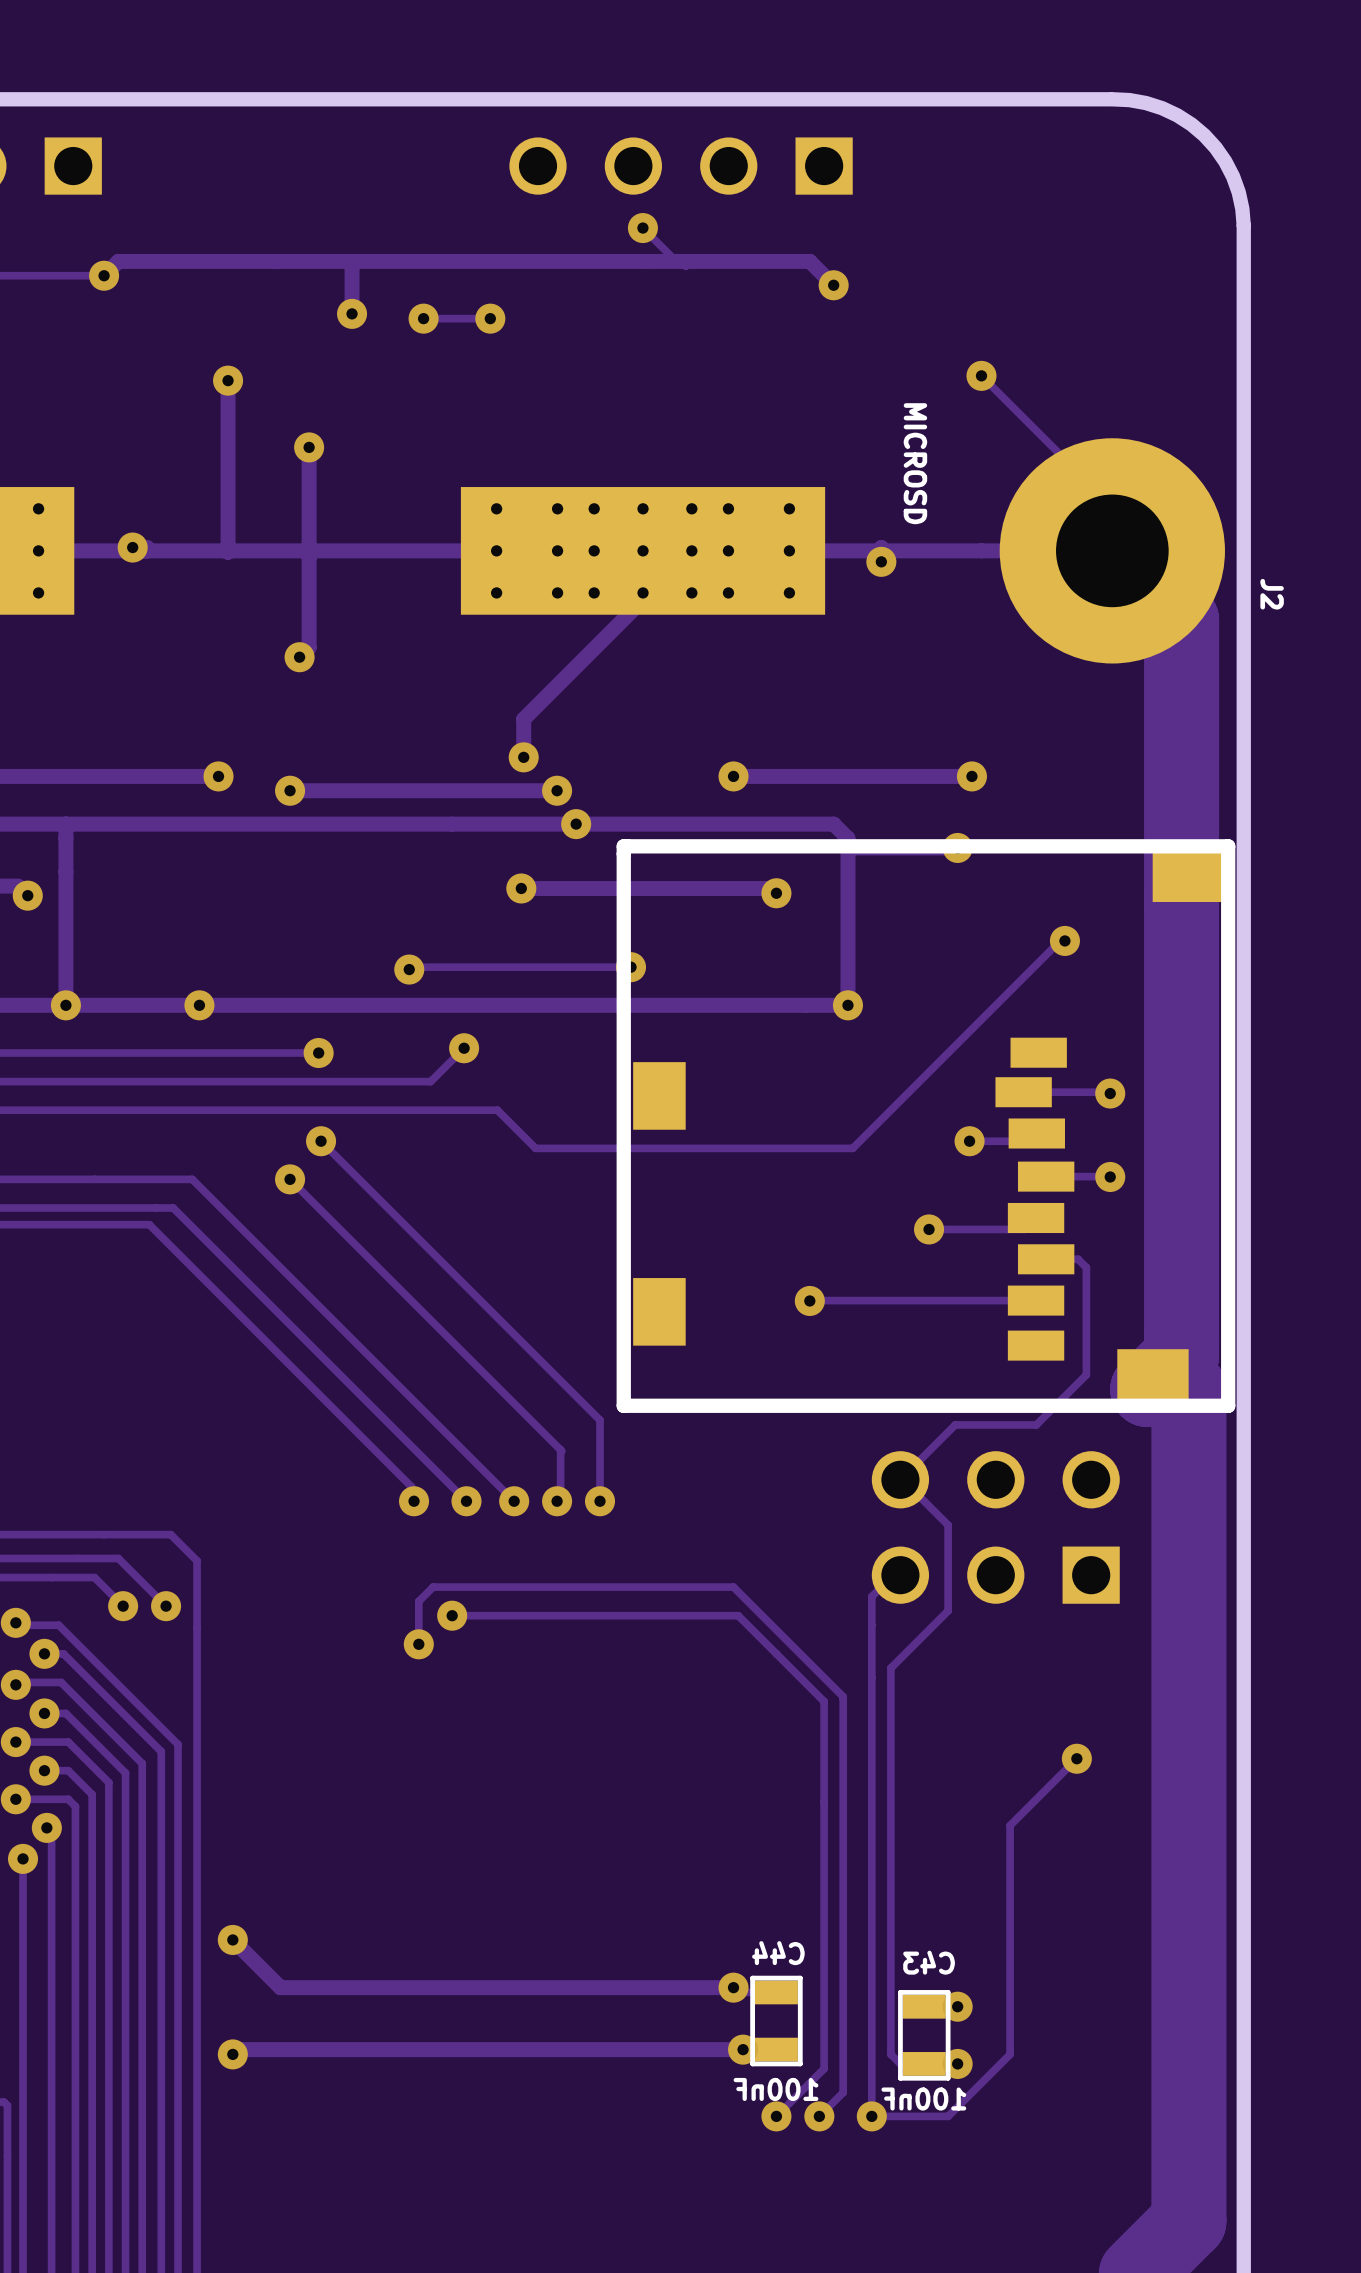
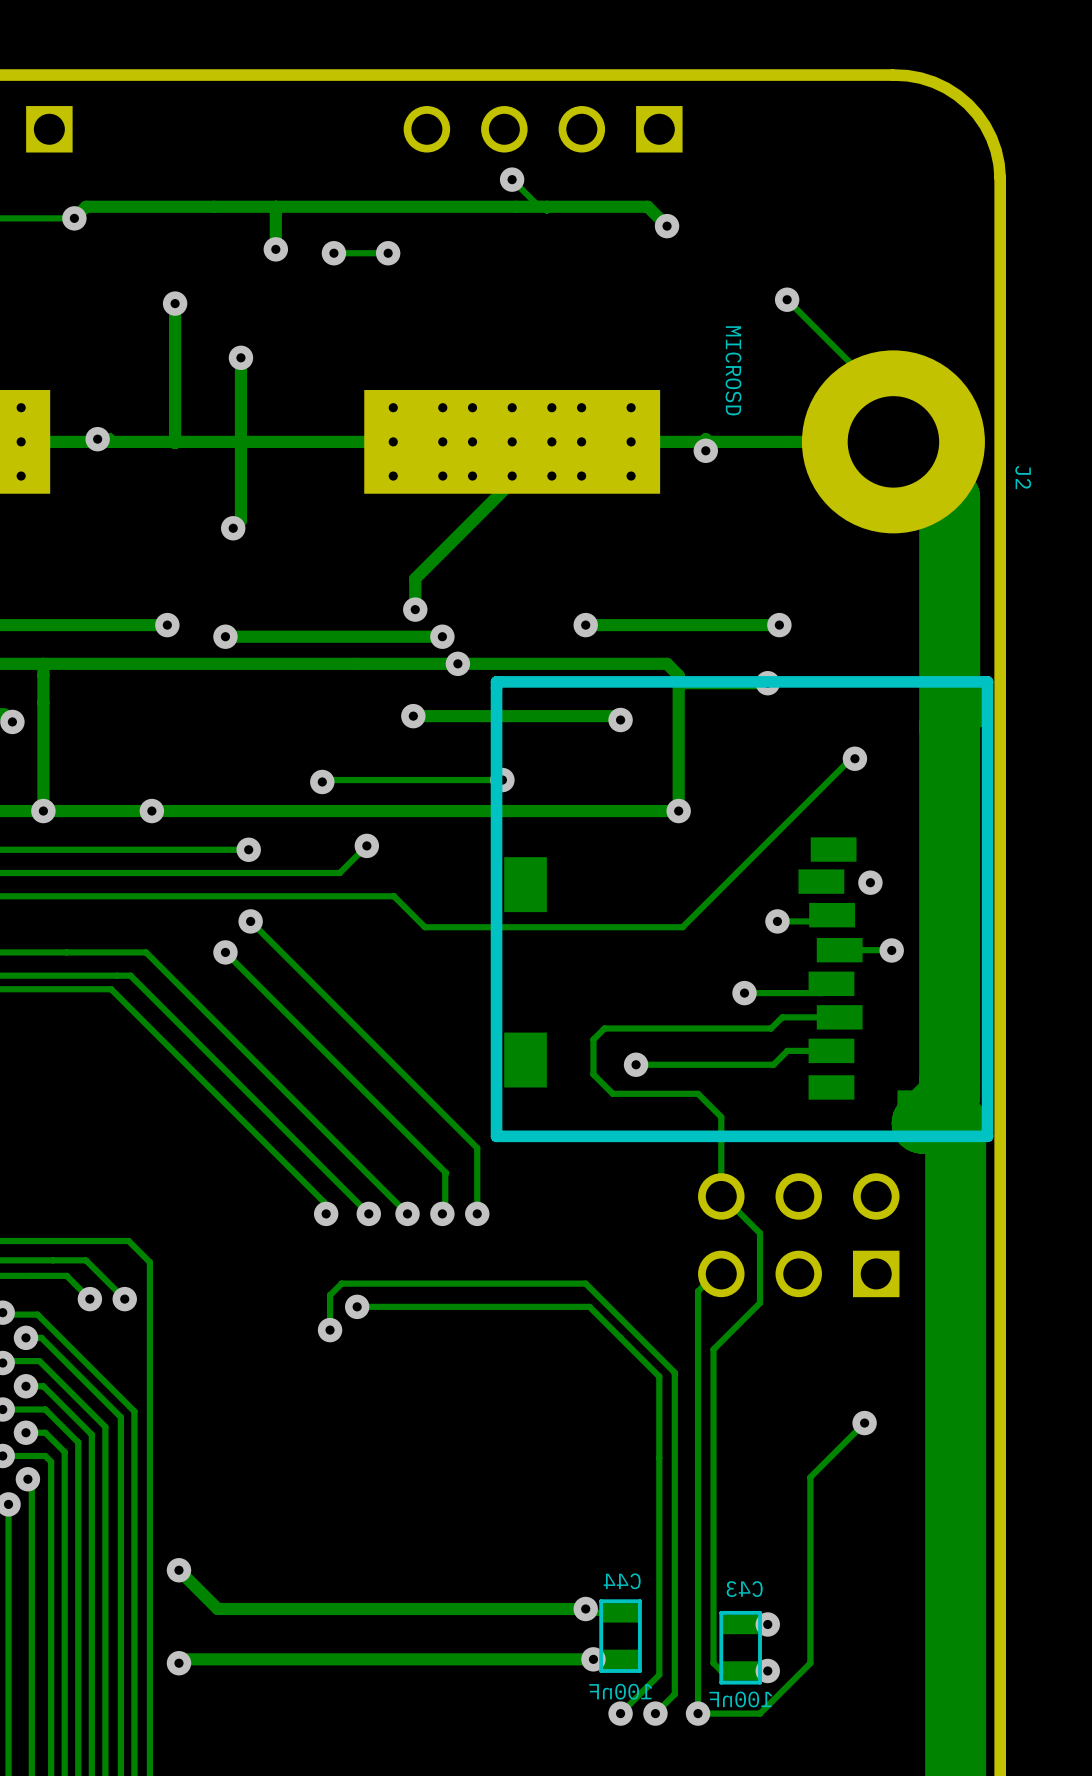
track: (1023, 1092) (1110, 1093) -> none
via position: (1110, 1093) -> (870, 882)
track: (1046, 1259) (1078, 1259) (1086, 1267) (1086, 1374) (1036, 1424) (955, 1424) (900, 1479) -> (839, 1017) (782, 1017) (771, 1028) (604, 1028) (593, 1039) (593, 1074) (612, 1093) (698, 1093) (721, 1117) (721, 1196)
via position: (809, 1300) -> (636, 1064)
track: (981, 1300) (810, 1300) -> (787, 1050) (773, 1064) (636, 1064)

